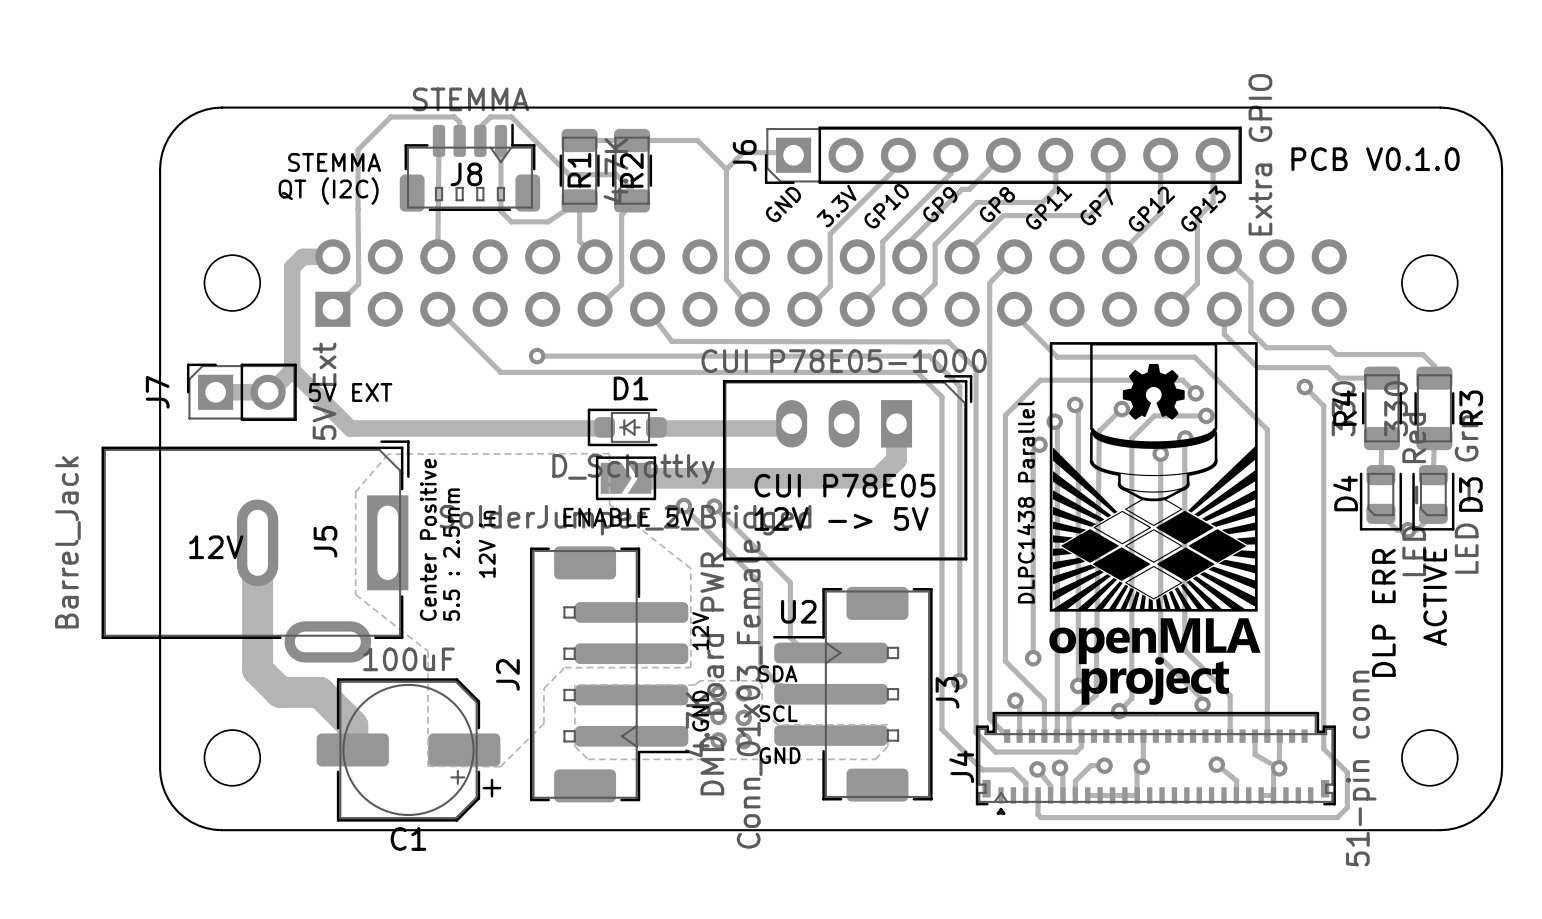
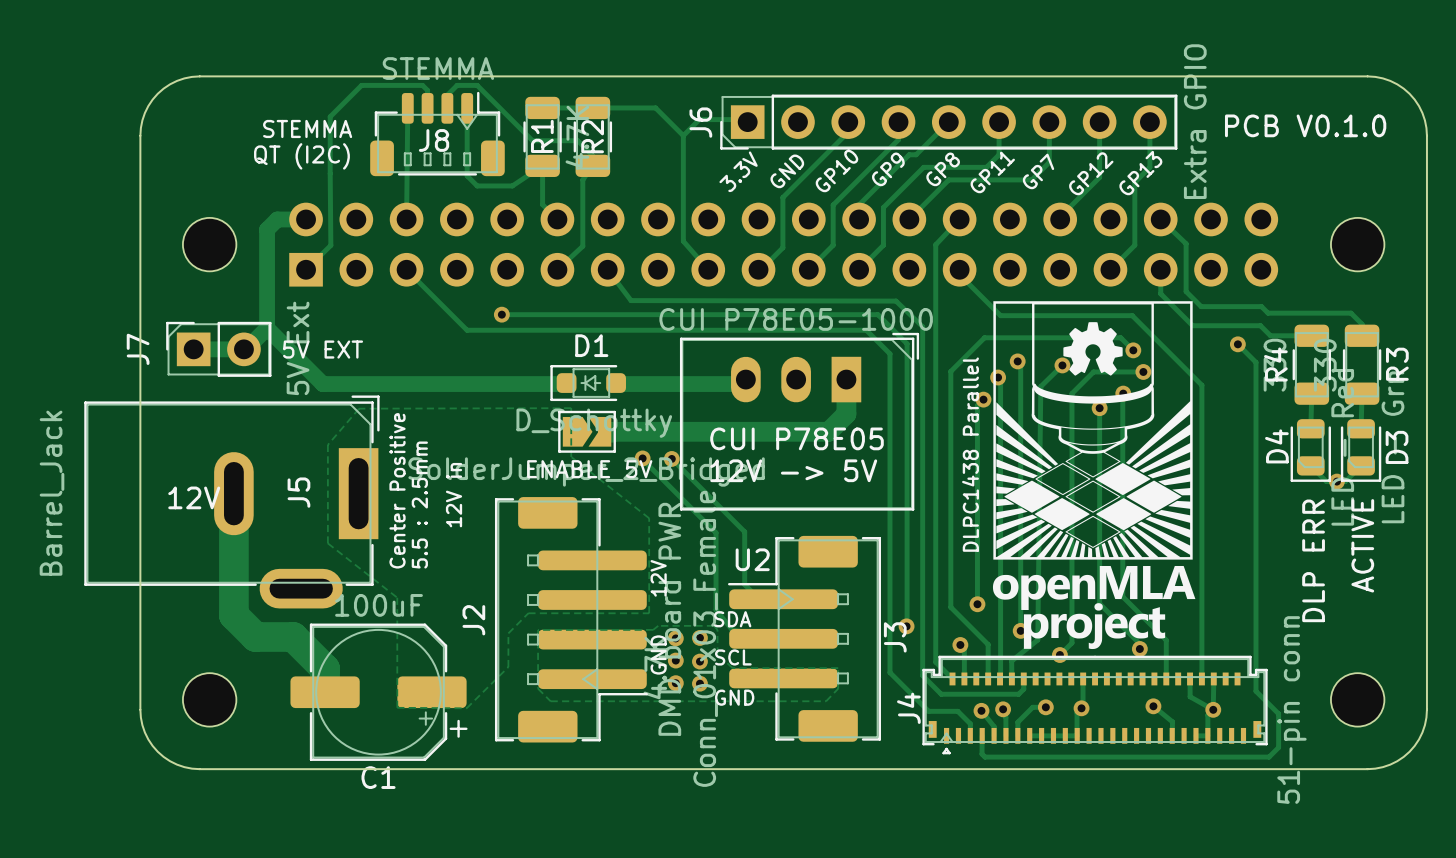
text position: GND (783, 204) -> GND (787, 171)
text position: 3.3V (836, 205) -> 3.3V (738, 171)

